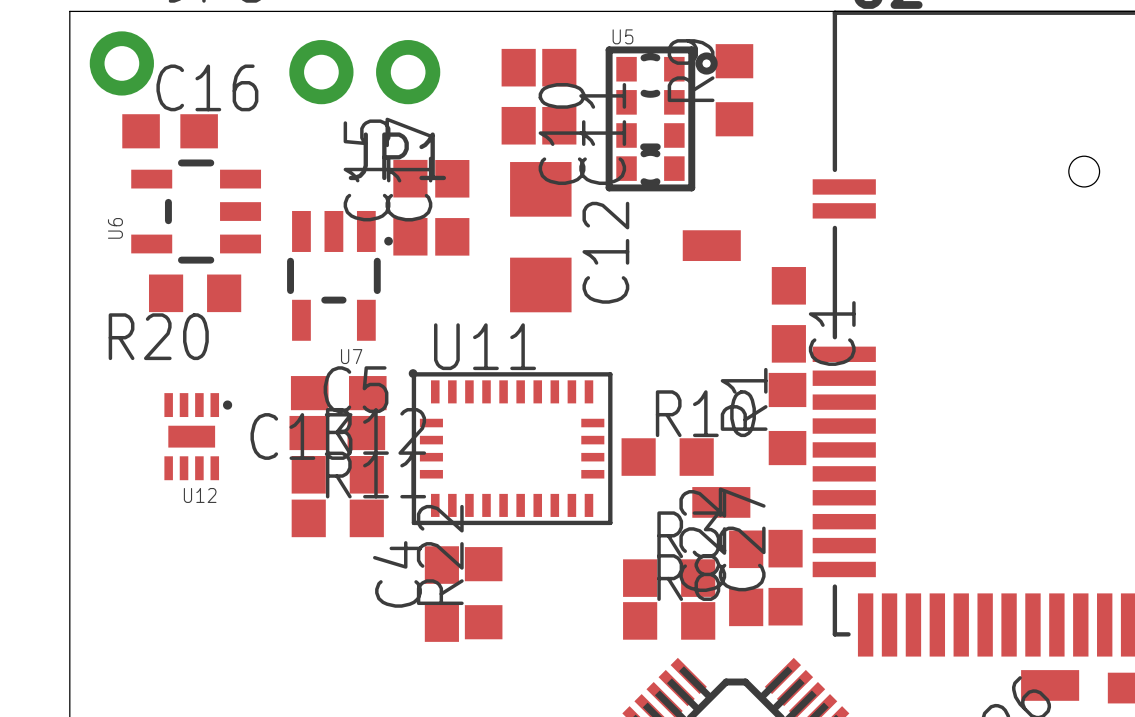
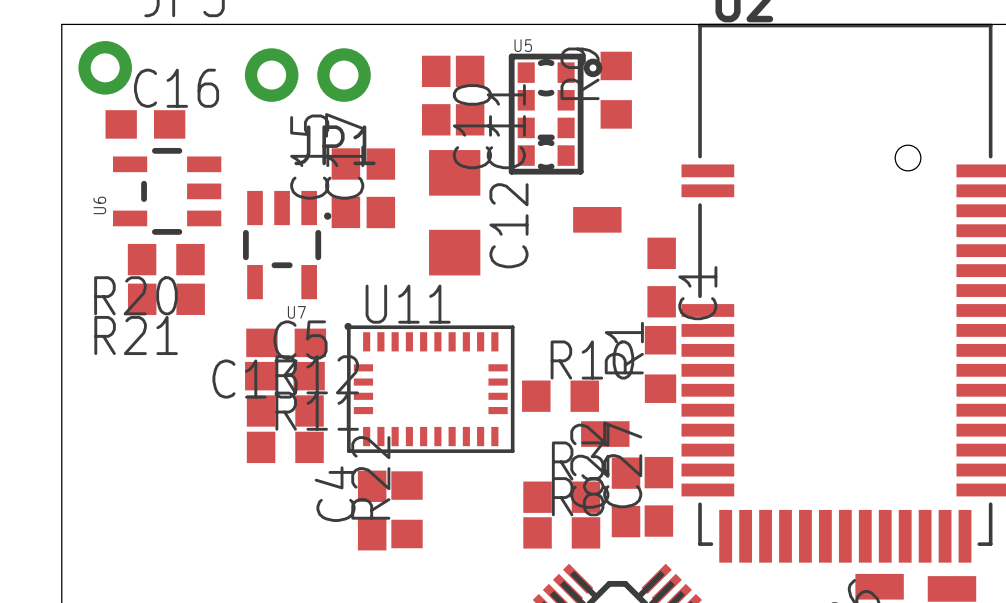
R21: none -> (166, 299)
U12: (198, 436) -> none

